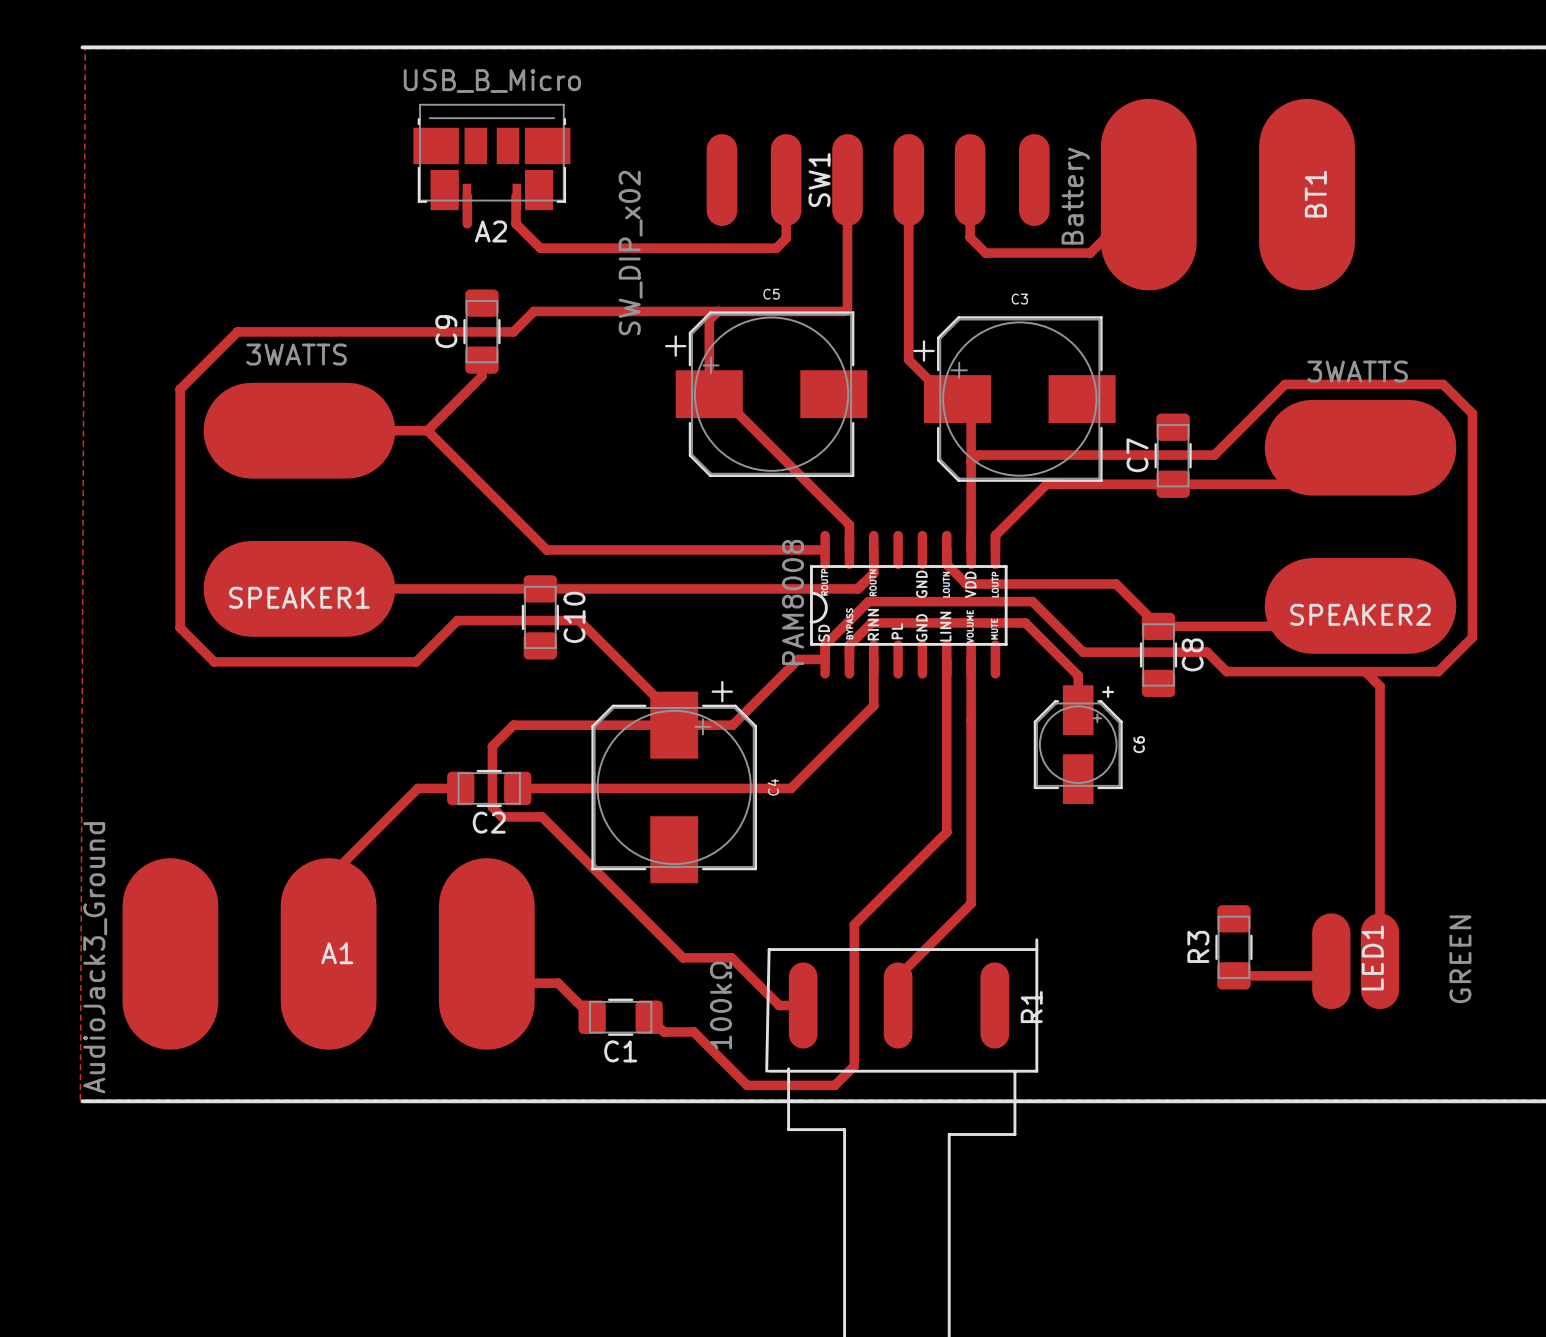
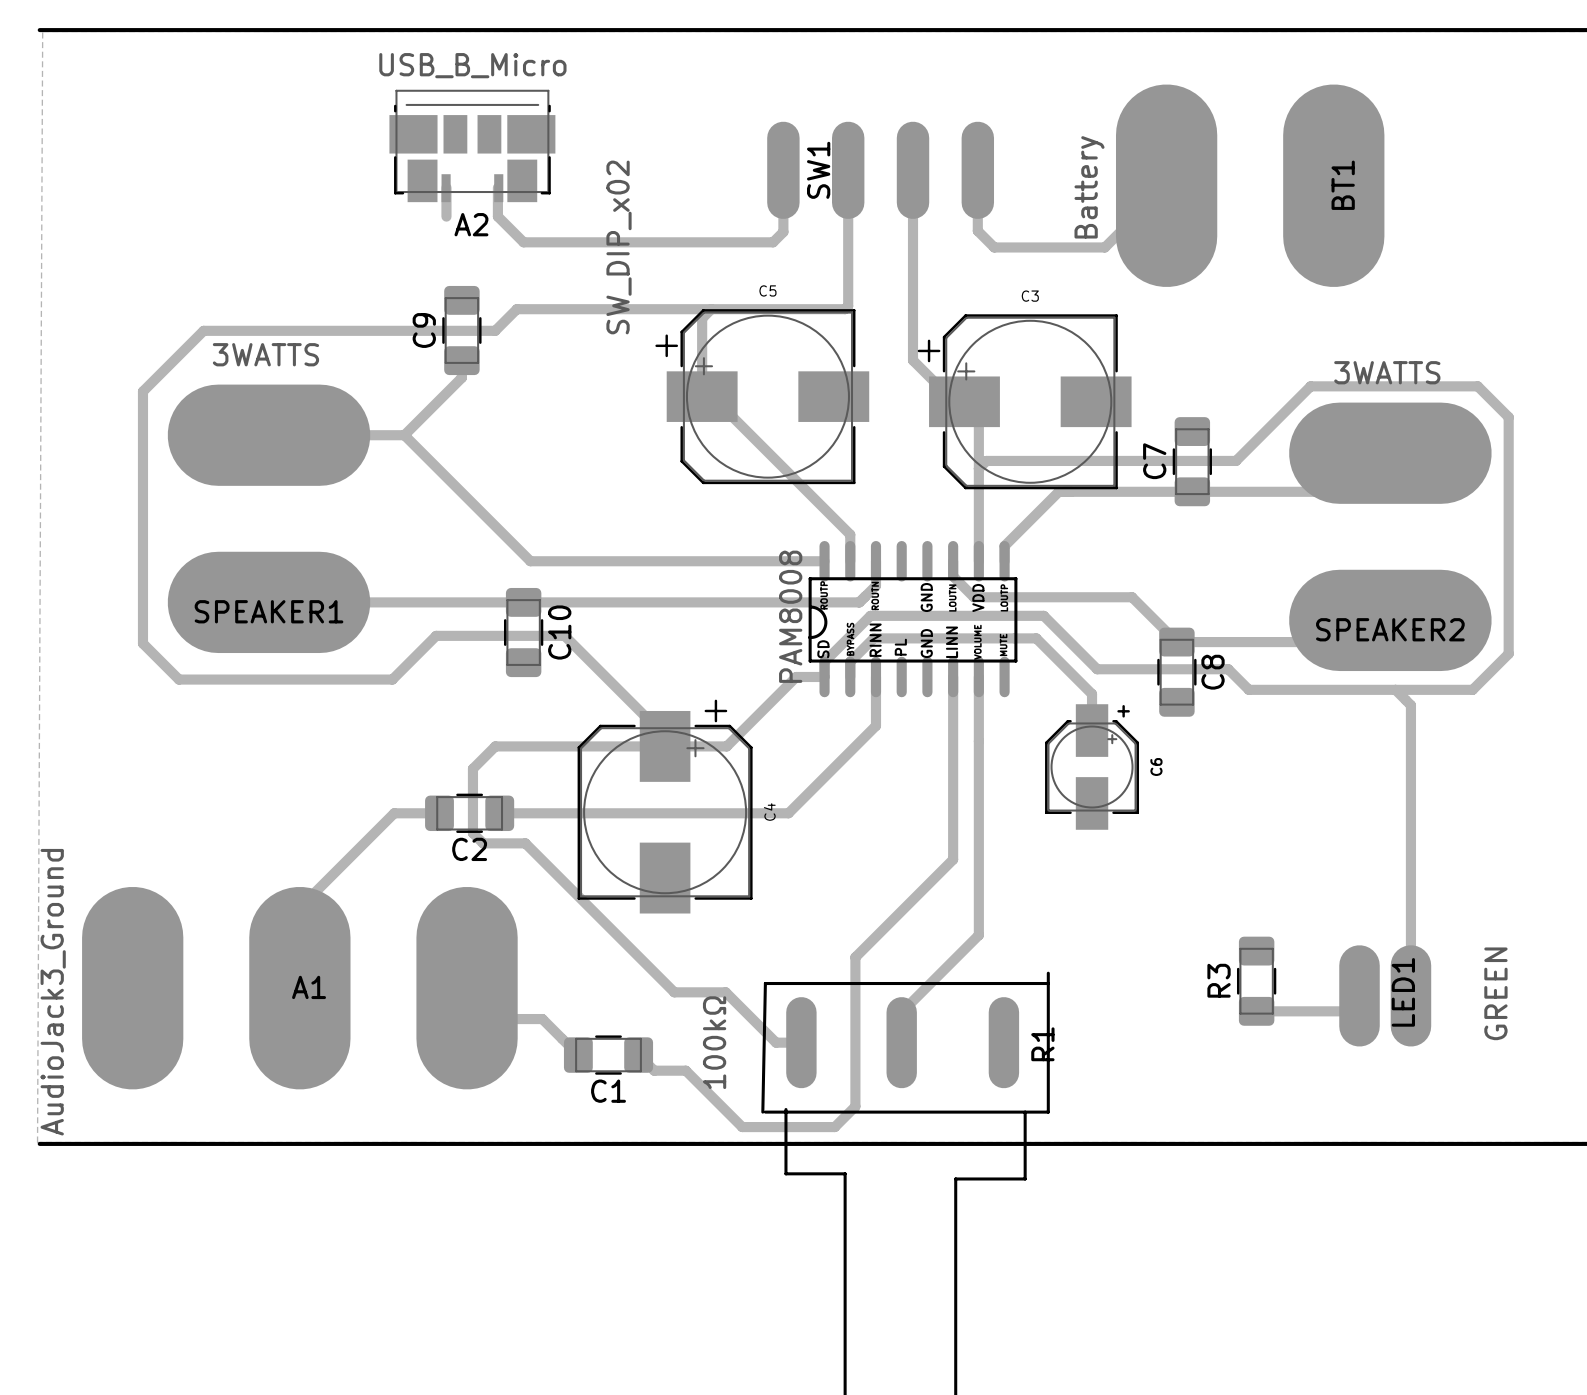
SW1 footprint: [706, 134, 1050, 227] -> [767, 121, 995, 219]

